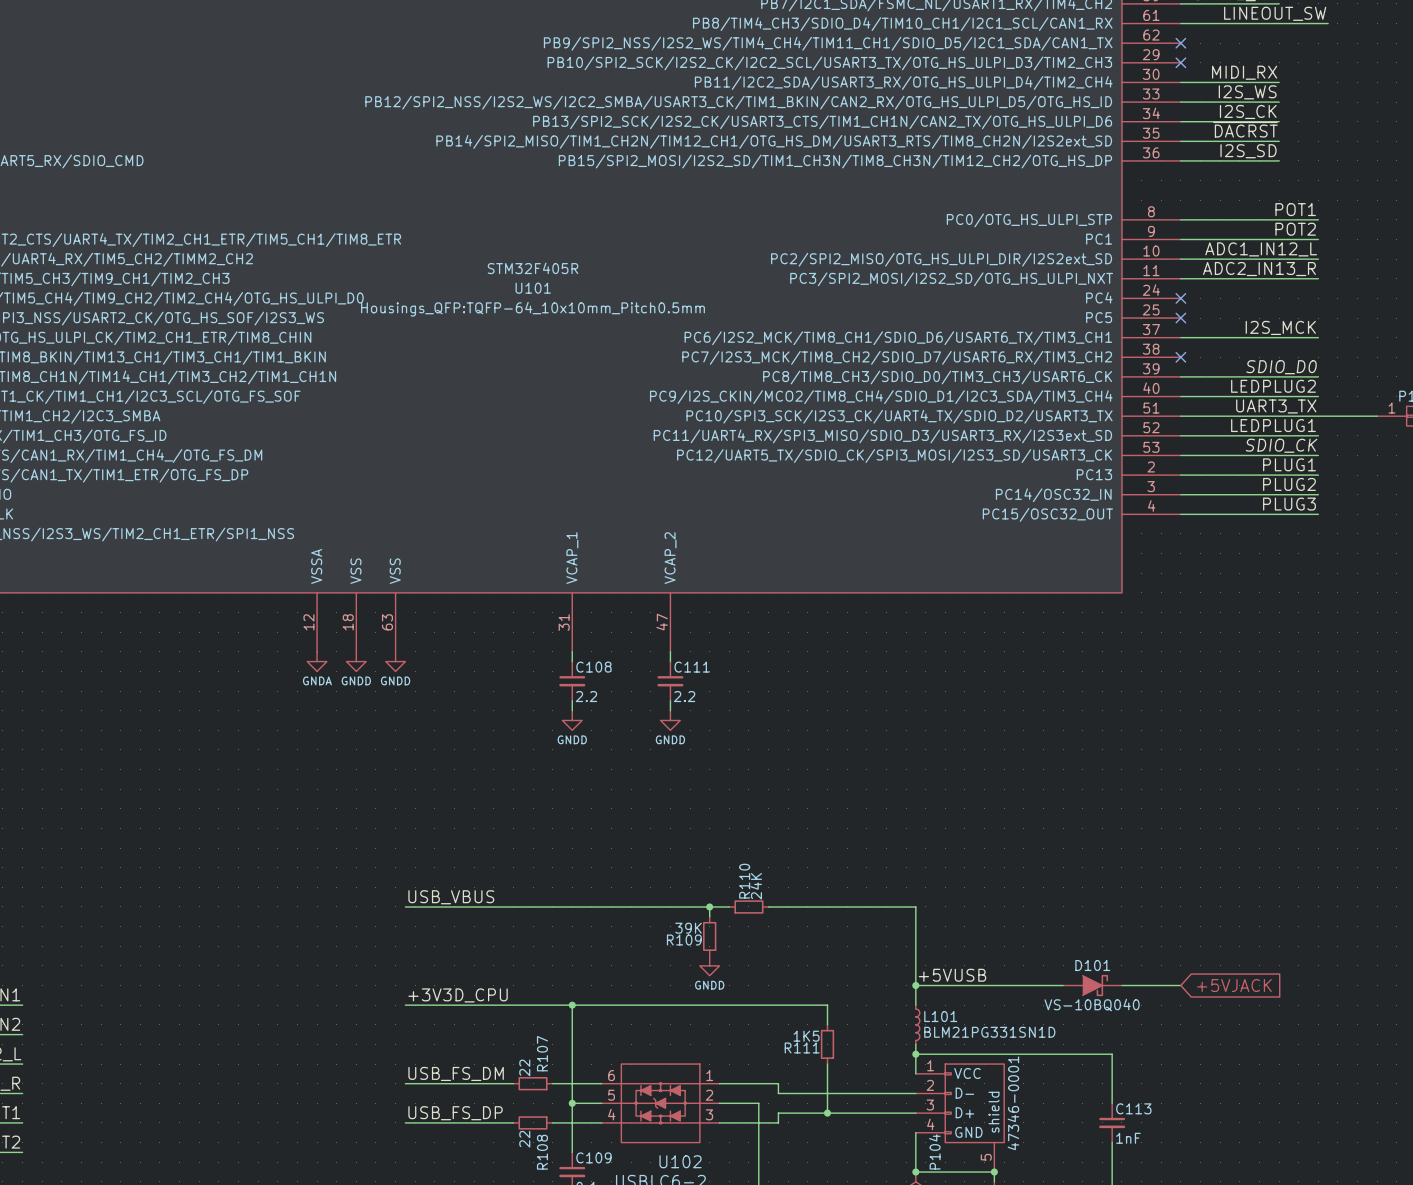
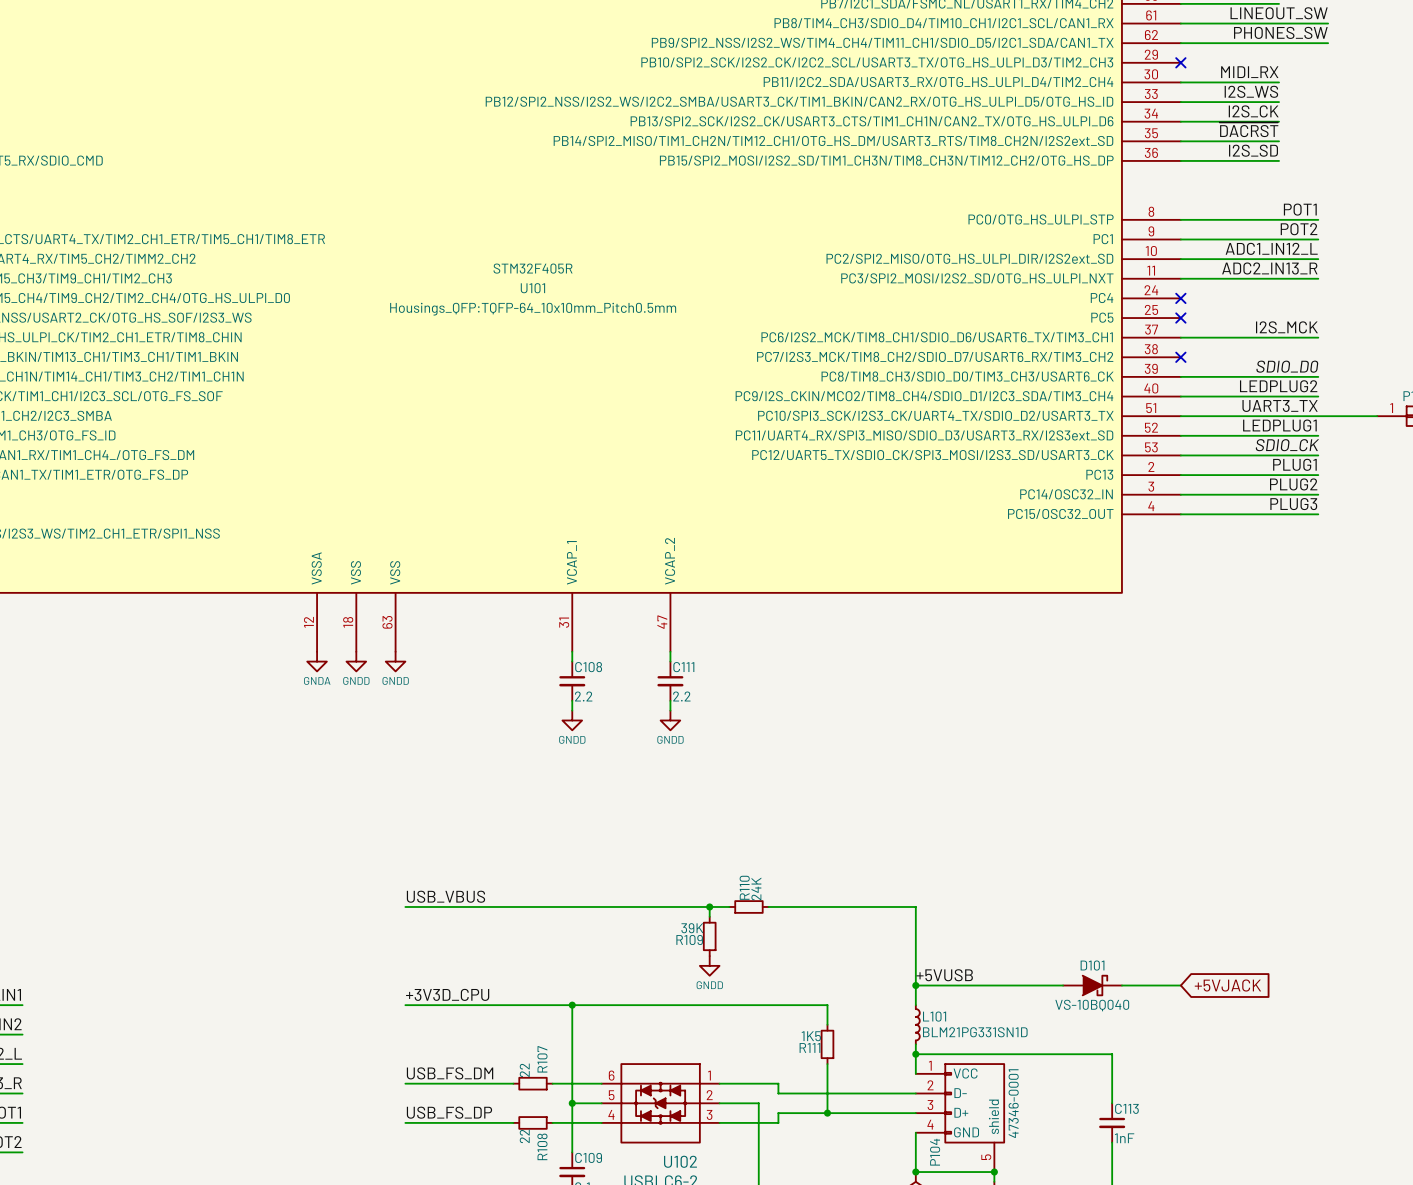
label: none -> PHONES_SW (1280, 32)
wire: none -> (1180, 43) (1328, 43)
no-connect mark: (1180, 43) -> none

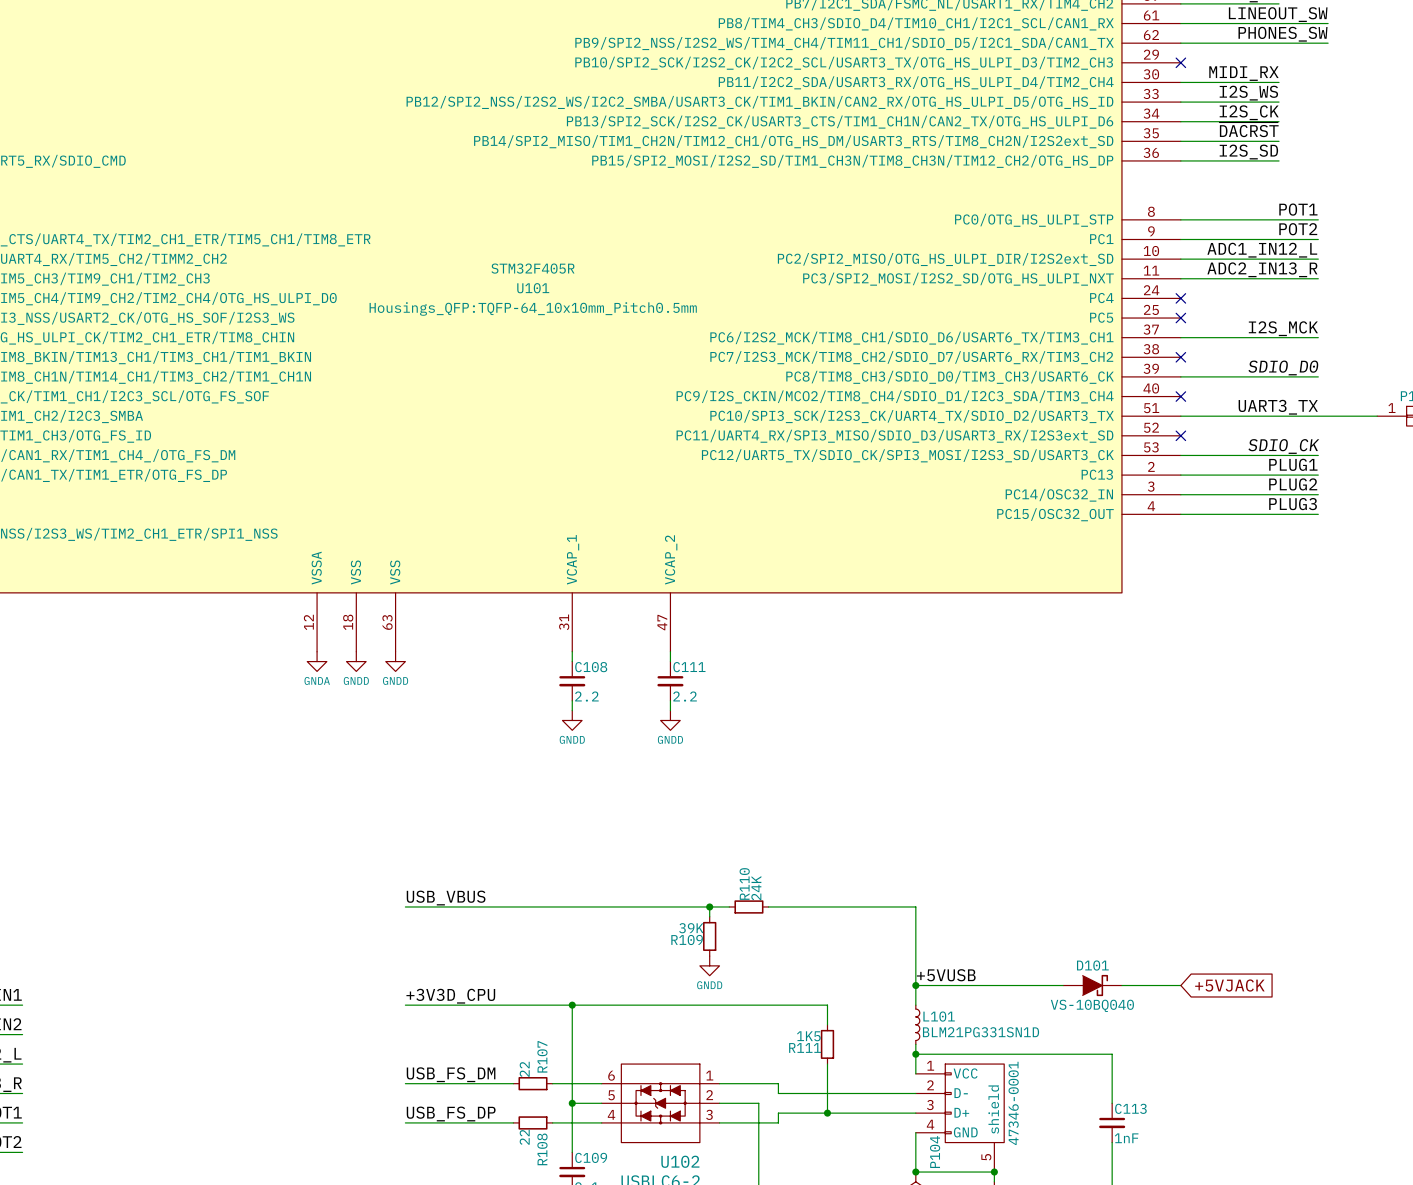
label: LEDPLUG2 (1278, 386) -> none
wire: (1180, 396) (1318, 396) -> none
no-connect mark: none -> (1180, 396)
label: LEDPLUG1 (1279, 425) -> none
wire: (1180, 435) (1318, 435) -> none
no-connect mark: none -> (1180, 435)

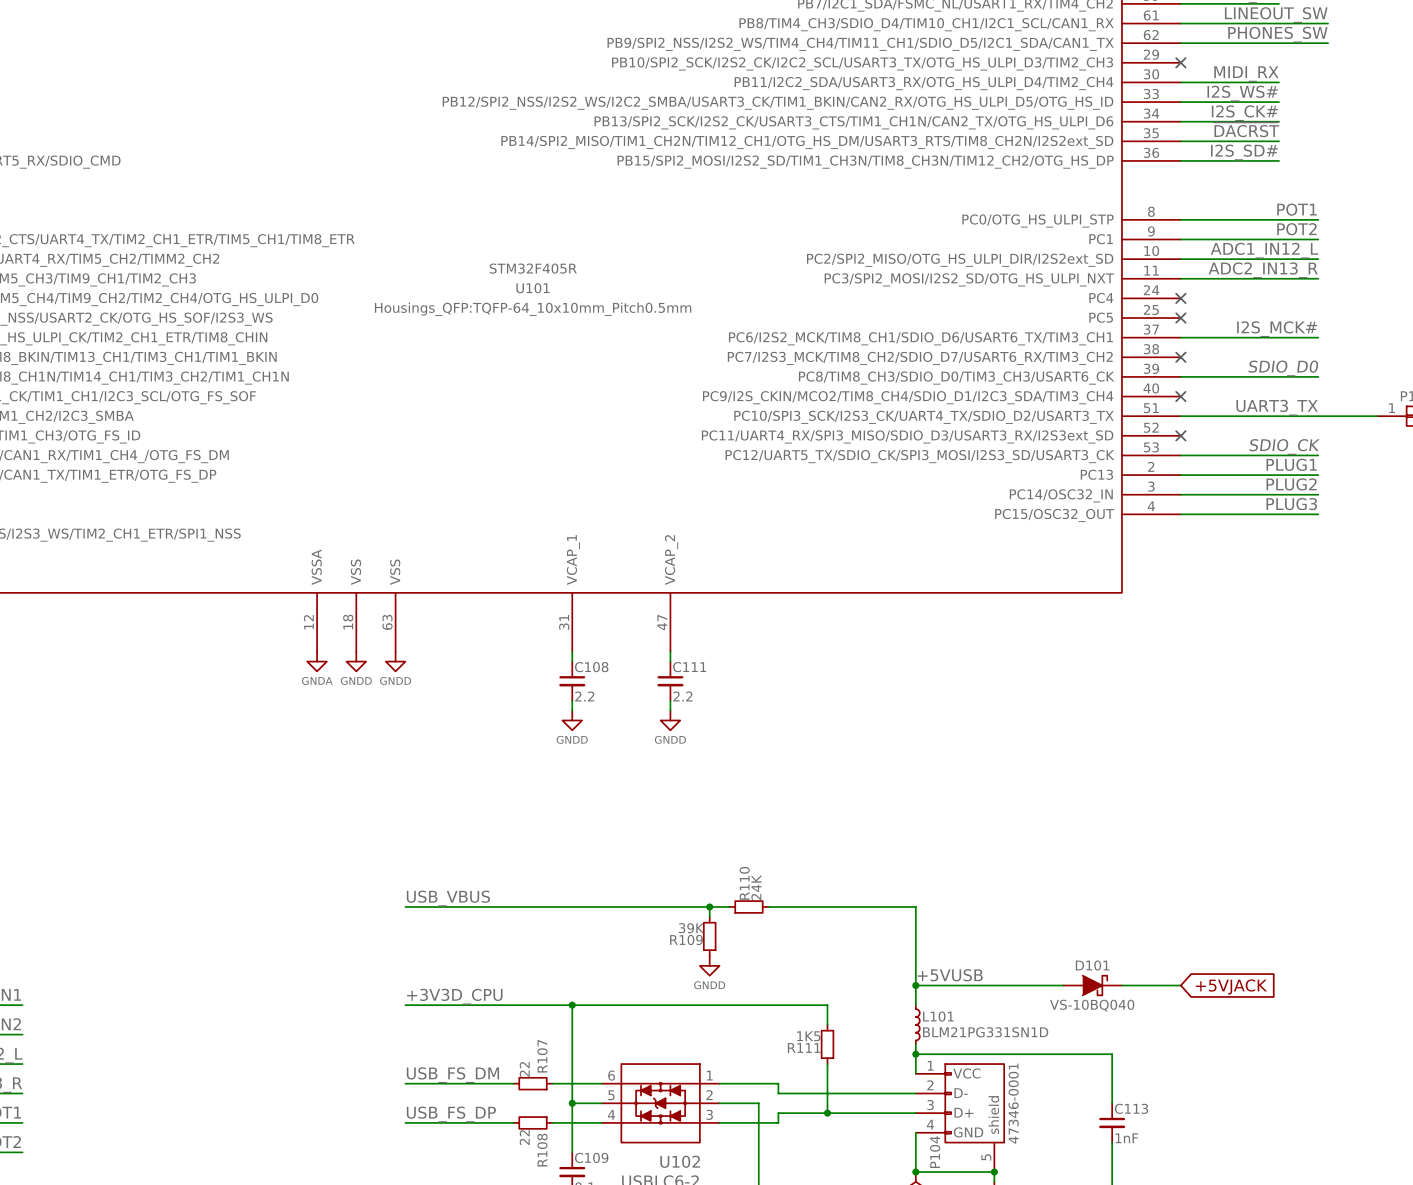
label: I2S_WS (1248, 93) -> I2S_WS# (1242, 93)
label: I2S_CK (1249, 112) -> I2S_CK# (1244, 113)
label: I2S_SD (1248, 152) -> I2S_SD# (1244, 152)
label: I2S_MCK (1283, 328) -> I2S_MCK# (1277, 329)

